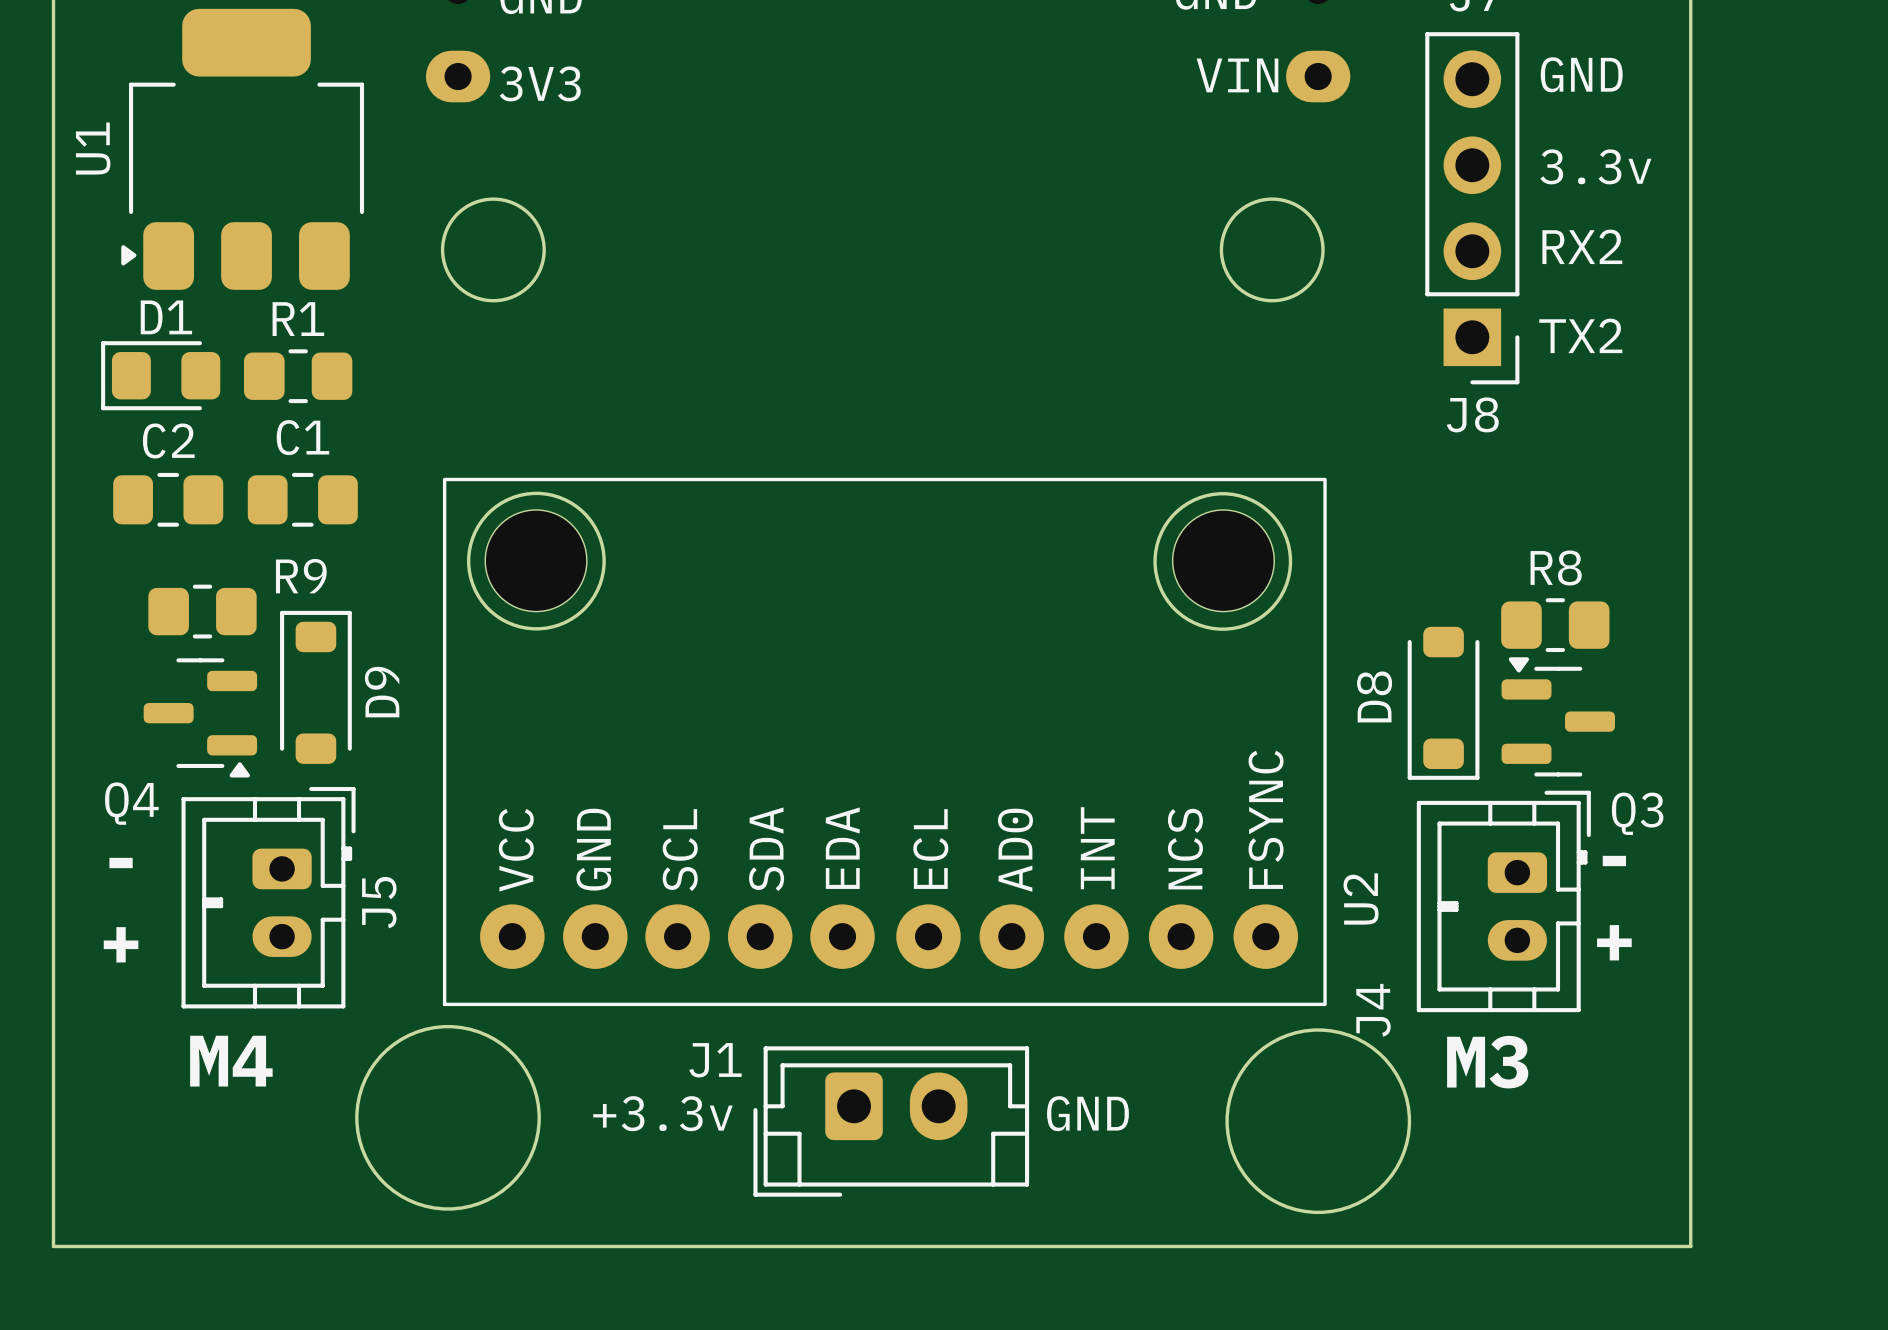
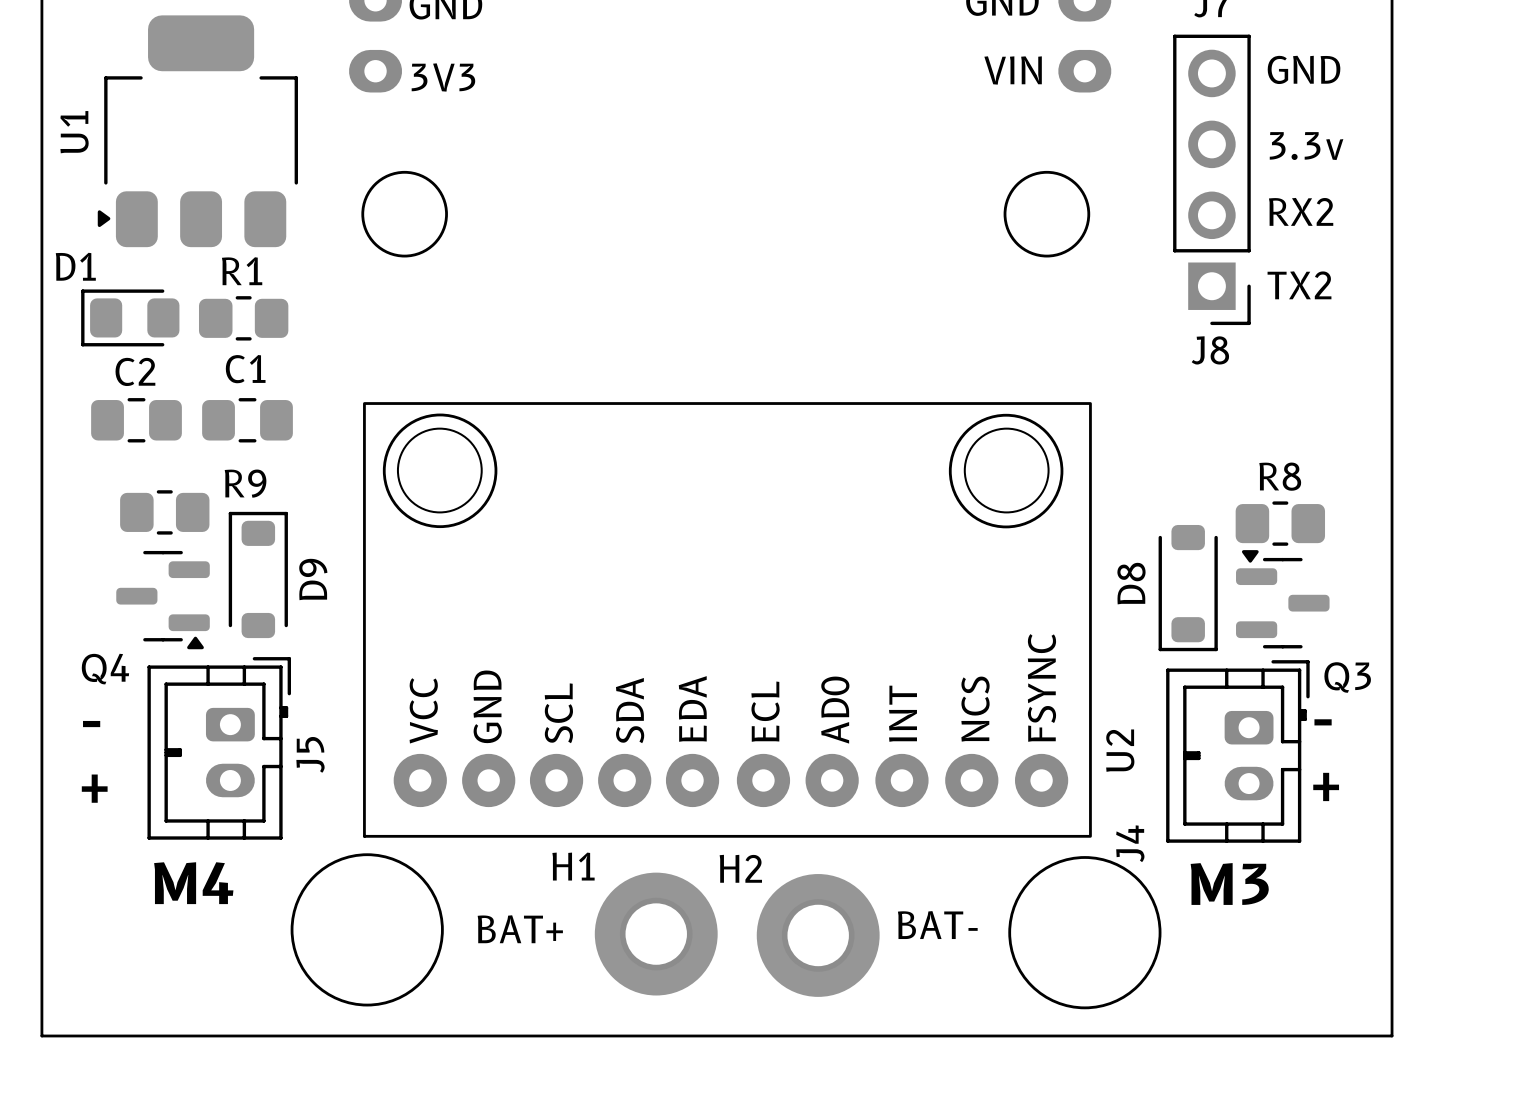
D1 name position: D1 (166, 317) -> D1 (75, 266)
text: none -> BAT- (937, 925)
text: +3.3v (662, 1113) -> BAT+ (520, 929)
text: GND (1087, 1113) -> none
J1: (891, 1121) -> none
H1: none -> (656, 934)
H2: none -> (818, 935)

